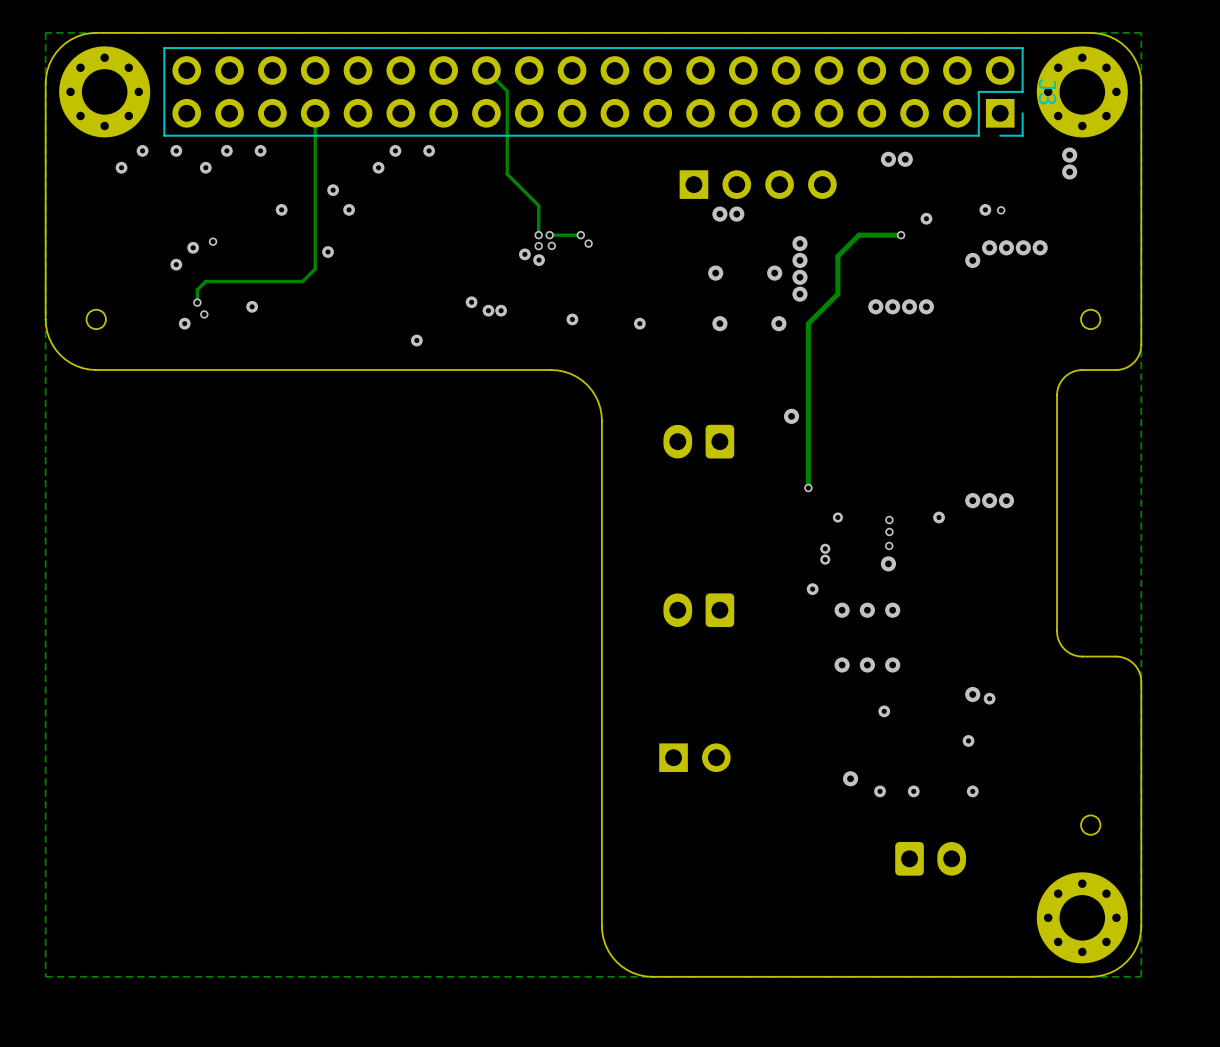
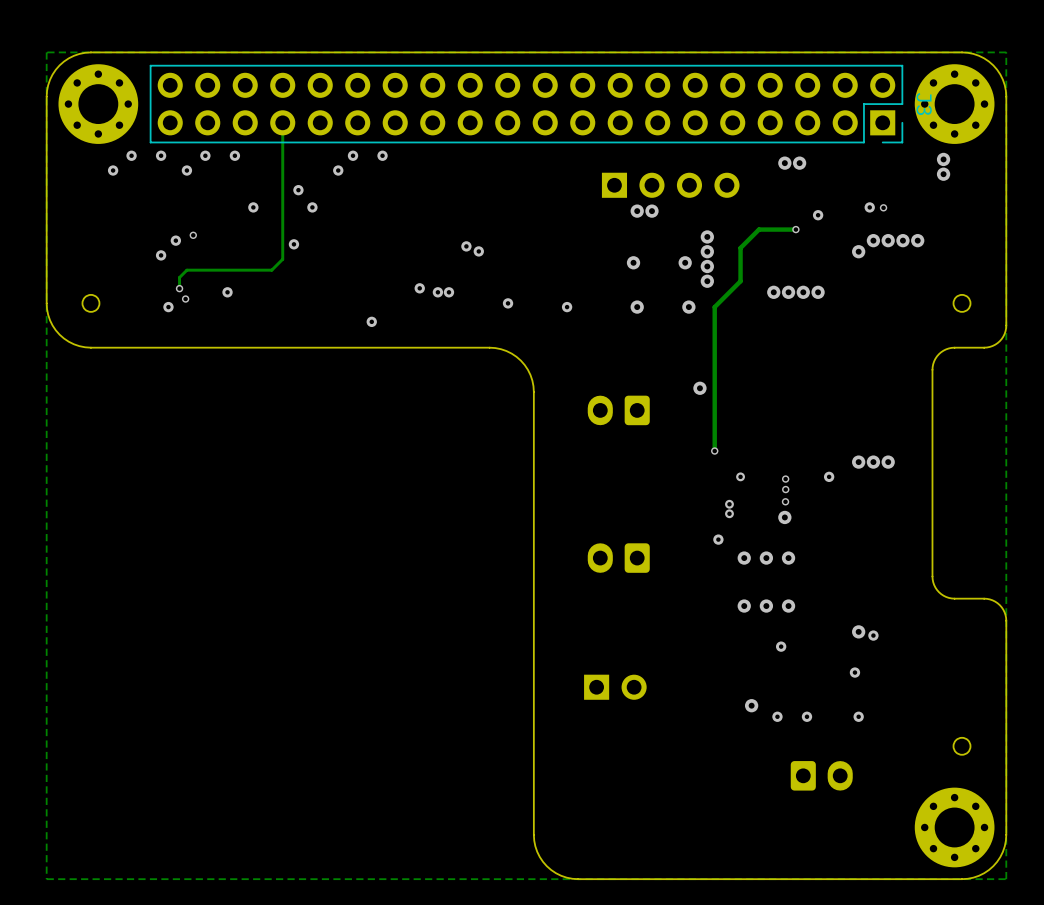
track: (486, 70) (507, 91) (507, 174) (538, 205) (538, 235) -> none
via: (538, 235) -> none
via: (549, 235) -> none
track: (580, 235) (549, 235) -> none
via: (580, 235) -> none
via: (588, 243) -> none
via: (551, 245) -> none
via: (538, 246) -> none
via: none -> (437, 292)
via: none -> (448, 292)
via: (488, 310) -> none
via: (501, 310) -> none

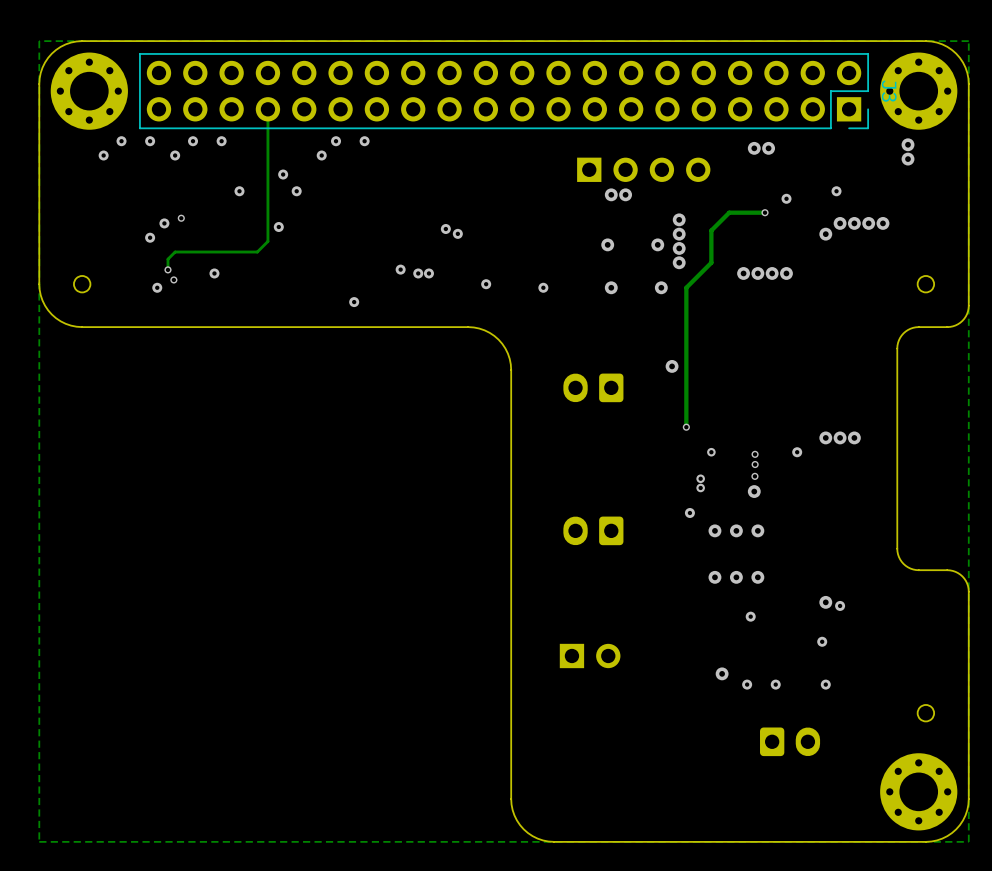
via: (883, 207) -> none

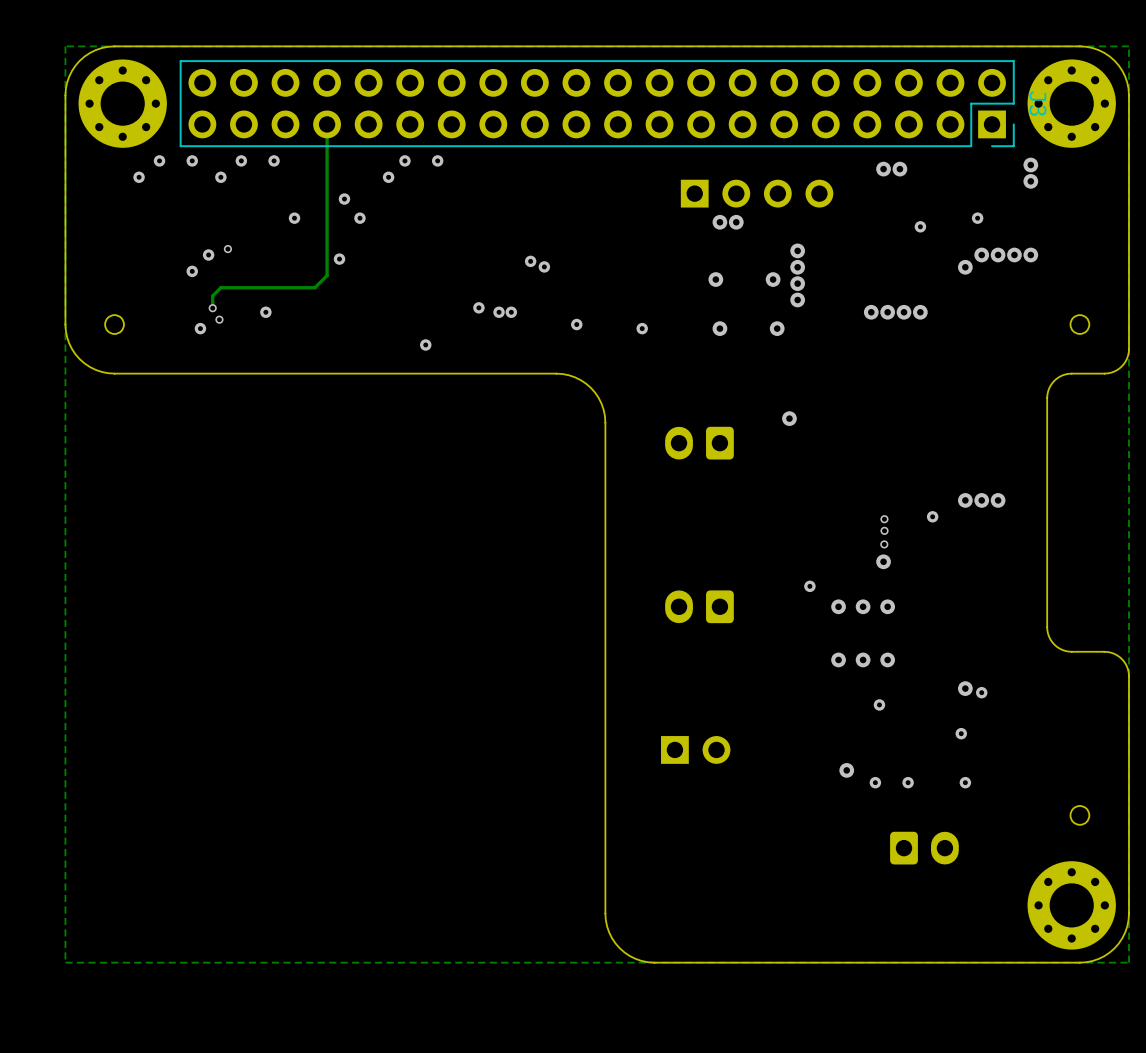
via: none -> (1030, 165)
via: (908, 144) -> none
via: none -> (1030, 181)
via: (908, 159) -> none
track: (765, 212) (729, 212) (711, 230) (711, 262) (686, 287) (686, 427) -> none
via: (765, 212) -> none
via: (686, 427) -> none
via: (711, 452) -> none
via: (700, 478) -> none
via: (700, 487) -> none

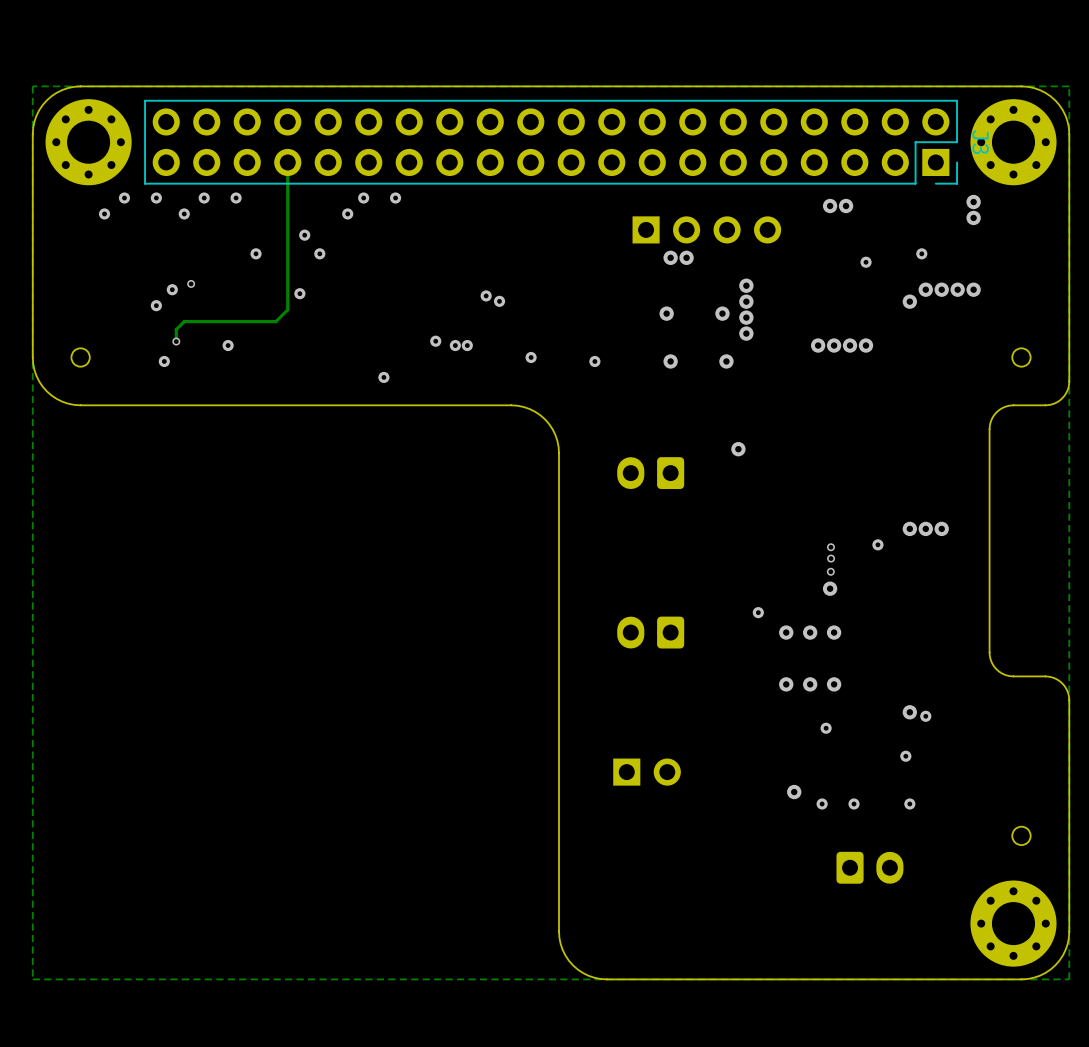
via: (219, 319) -> none

